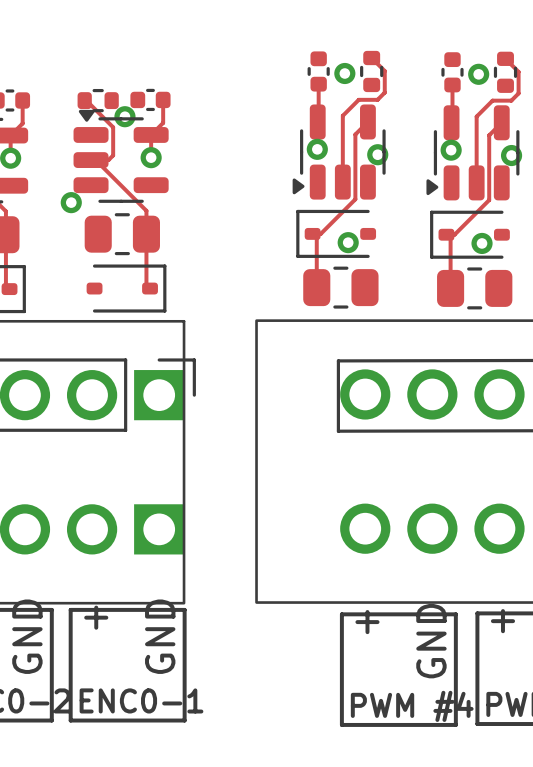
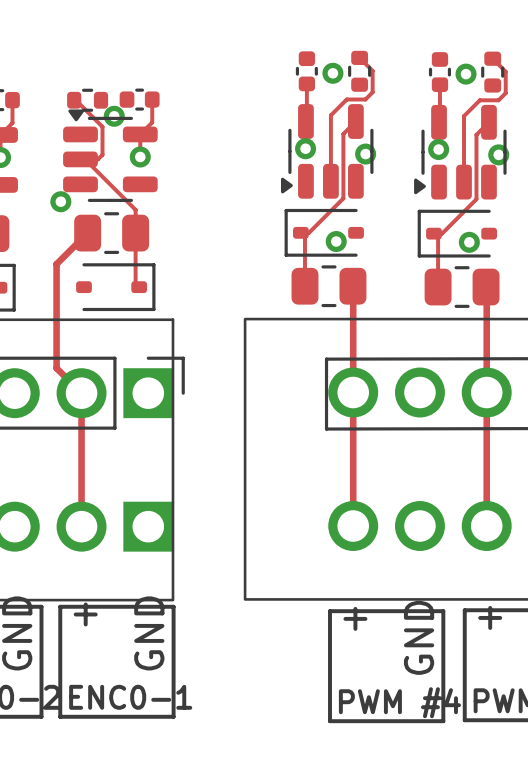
track: none -> (87, 233) (56, 264) (56, 368) (81, 393) (81, 526)
track: none -> (353, 286) (353, 526)
track: none -> (486, 287) (486, 526)

